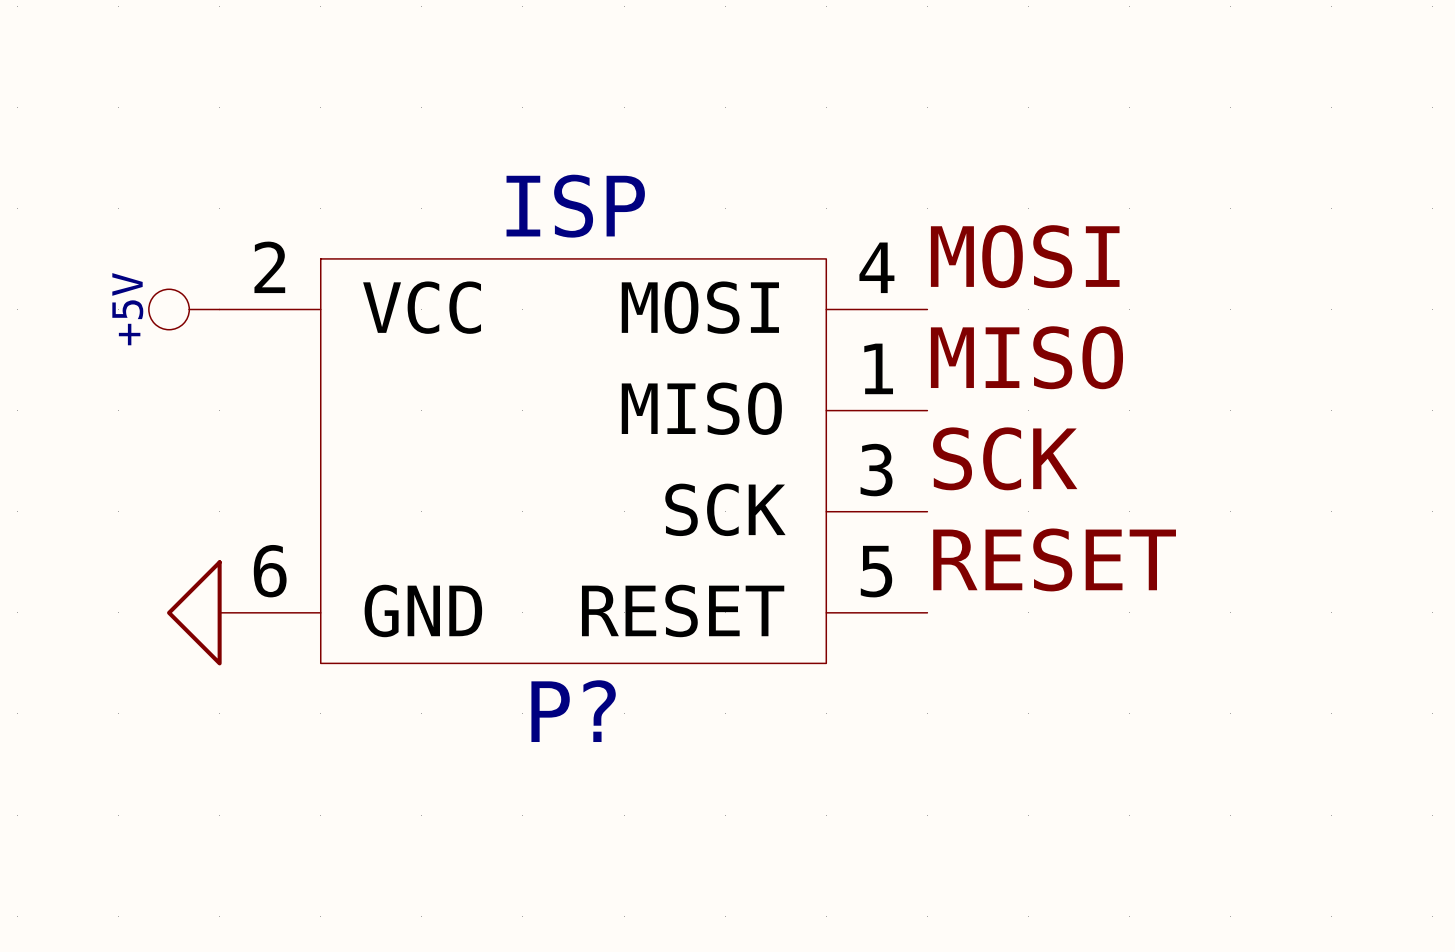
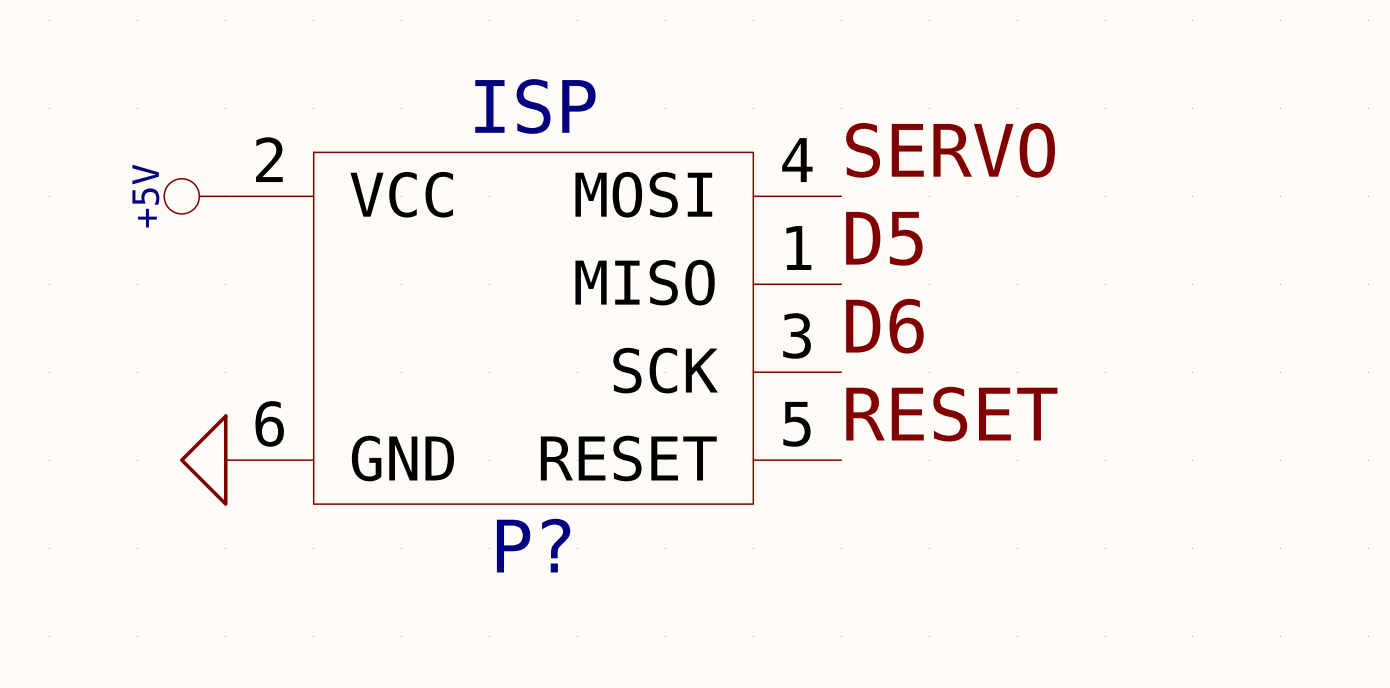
label: MOSI (1025, 256) -> SERVO (950, 150)
label: MISO (1026, 357) -> D5 (884, 238)
label: SCK (1005, 458) -> D6 (884, 326)

